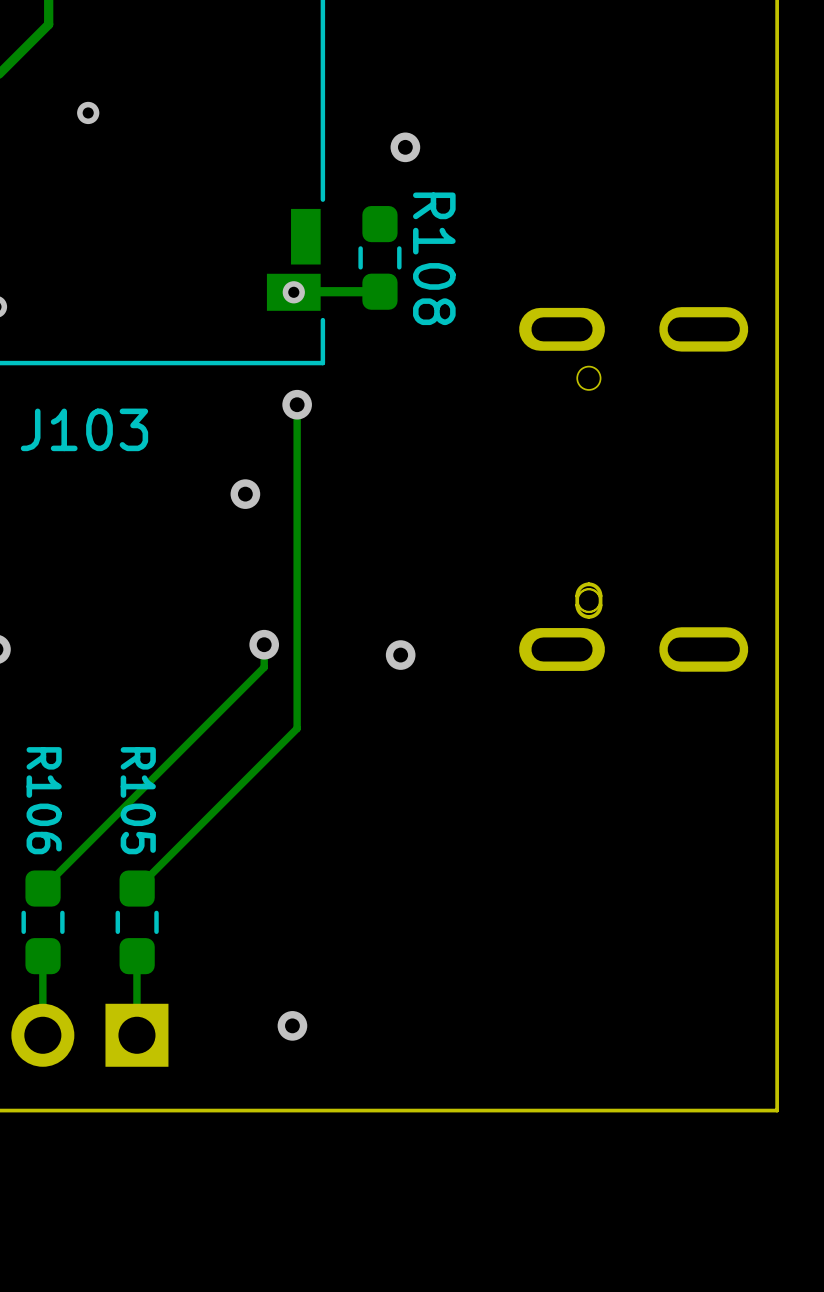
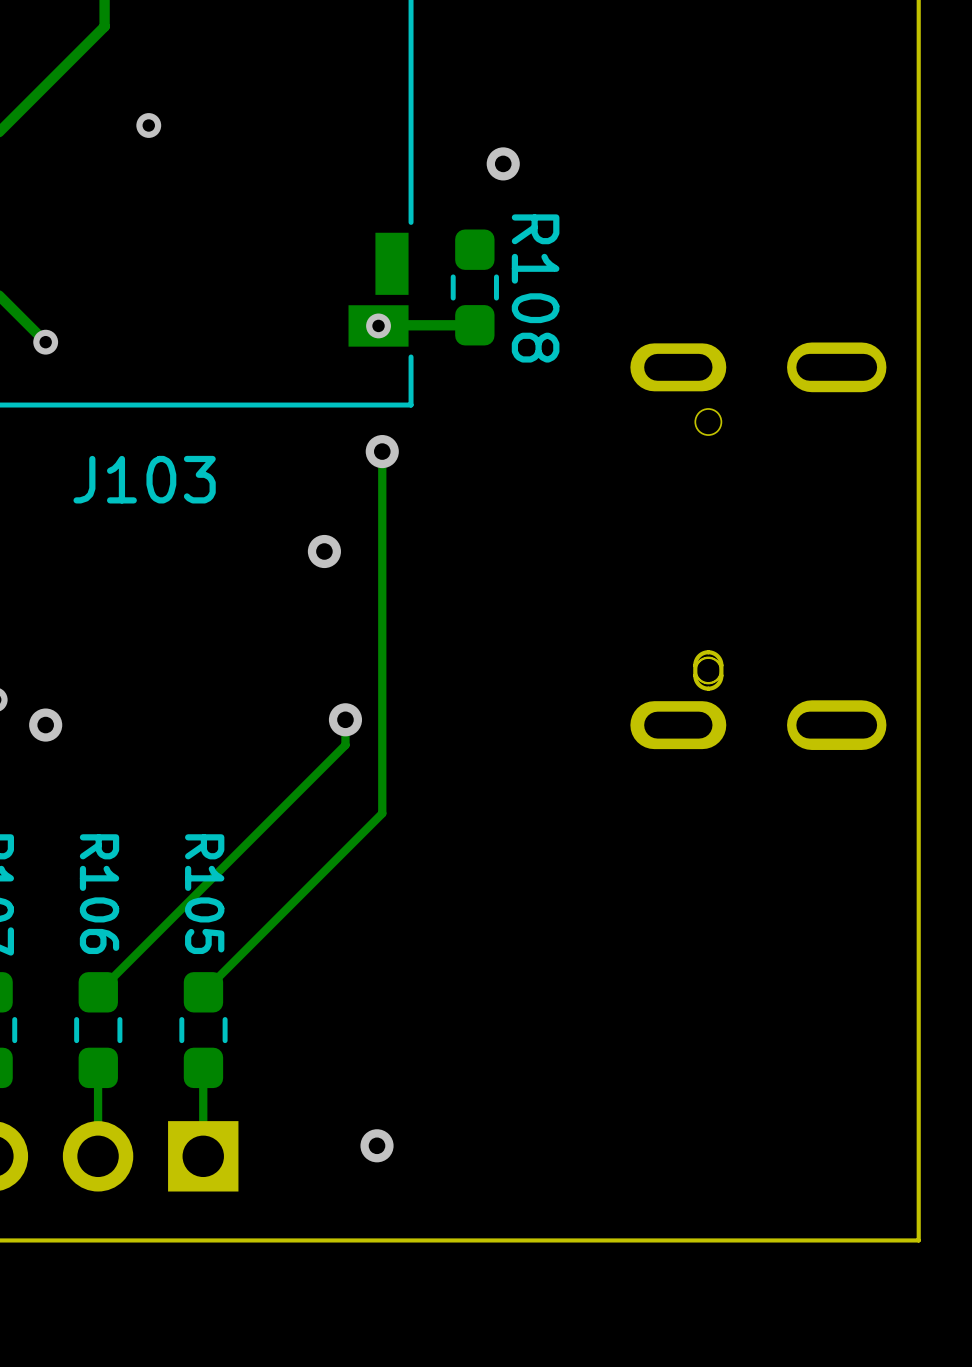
via: (400, 655) -> none

